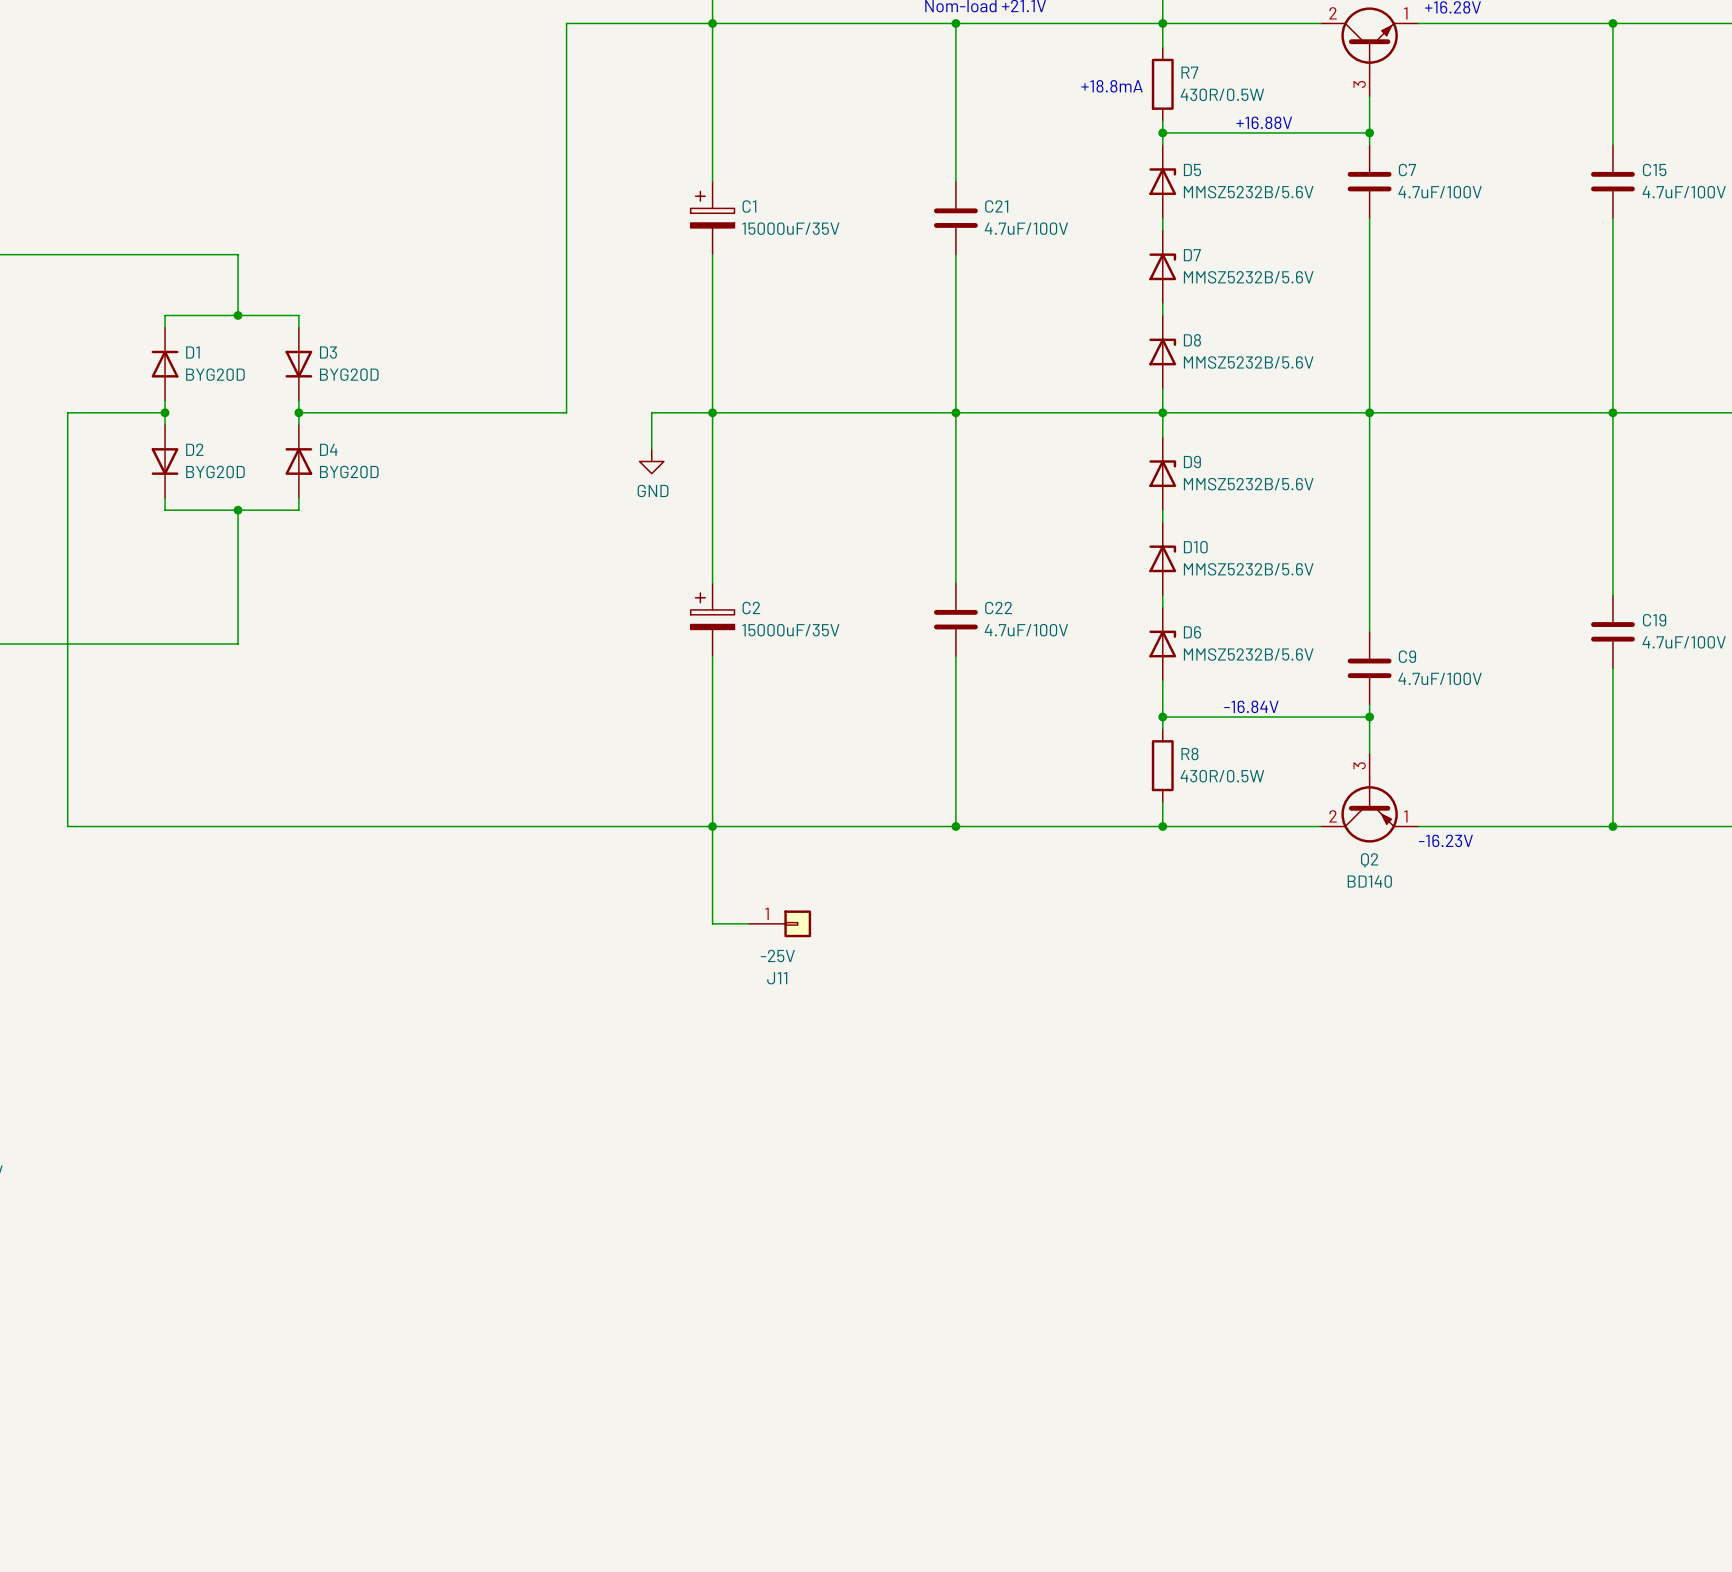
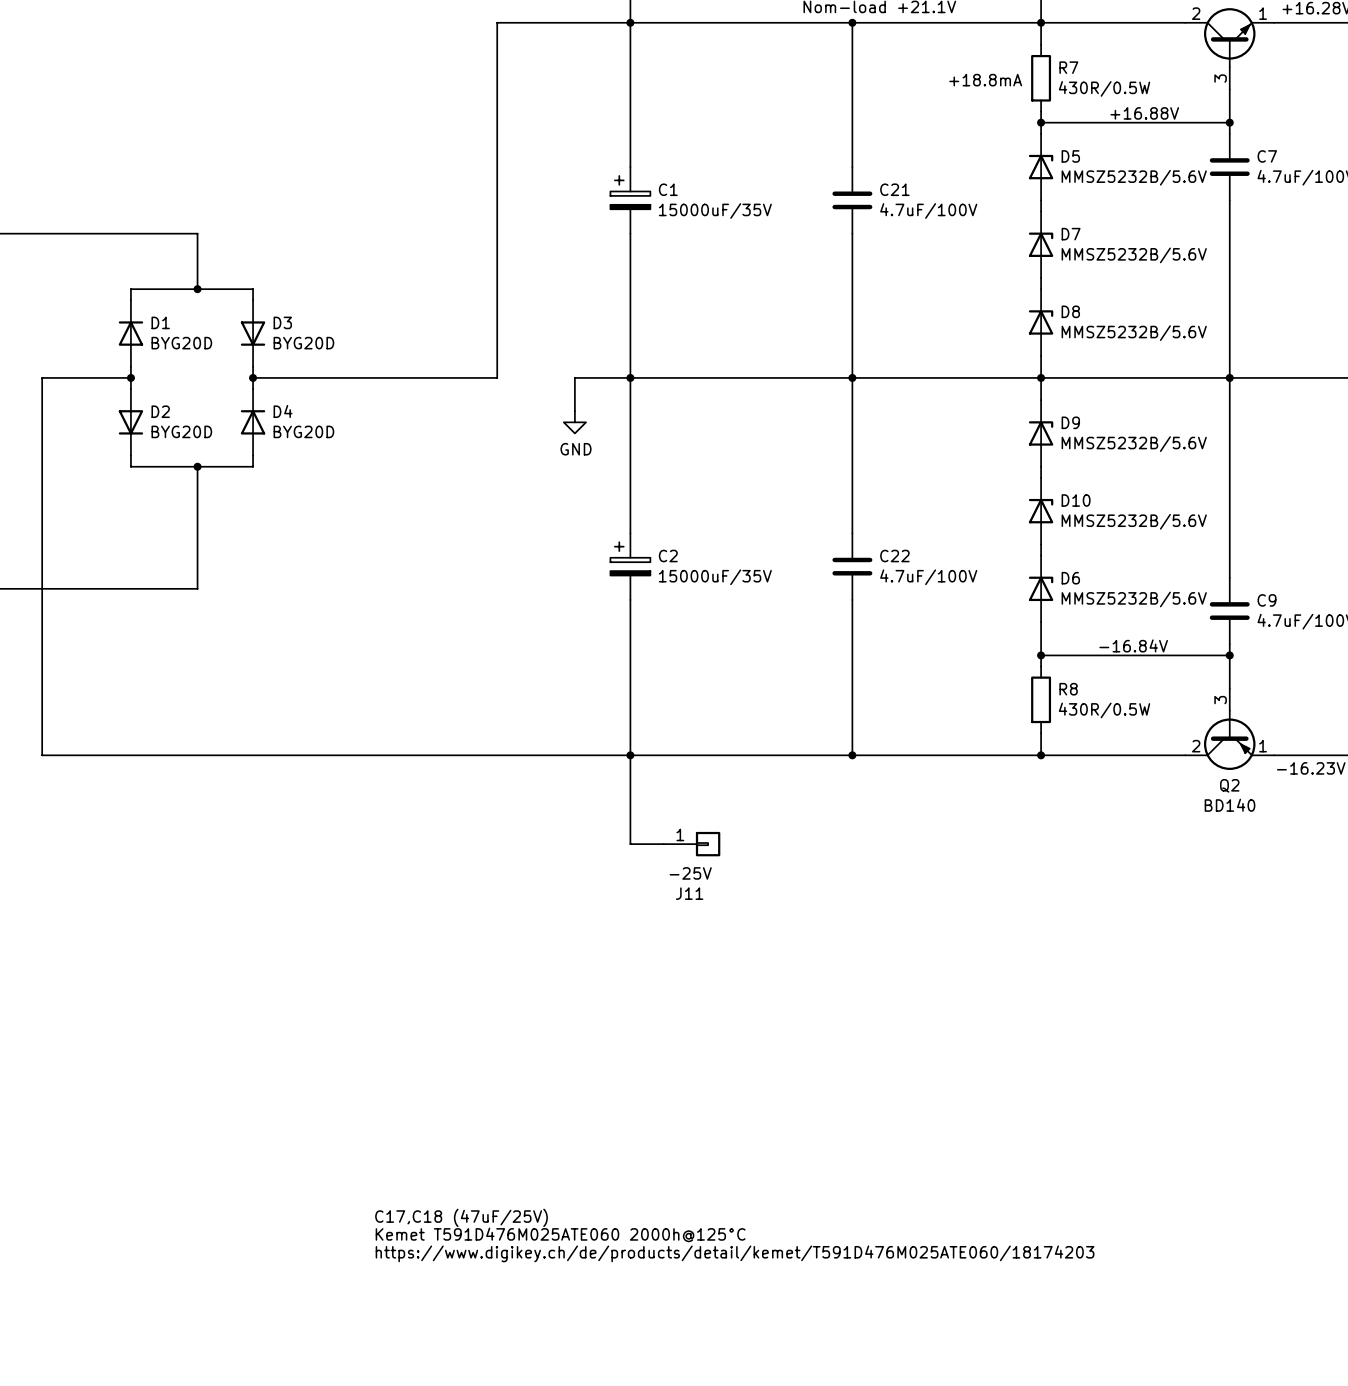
text: none -> C17,C18 (47uF/25V) (461, 1217)
text: none -> Kemet T591D476M025ATE060 2000h@125°C (560, 1234)
text: none -> https://www.digikey.ch/de/products/detail/kemet/T591D476M025ATE060/18174203 (735, 1253)

